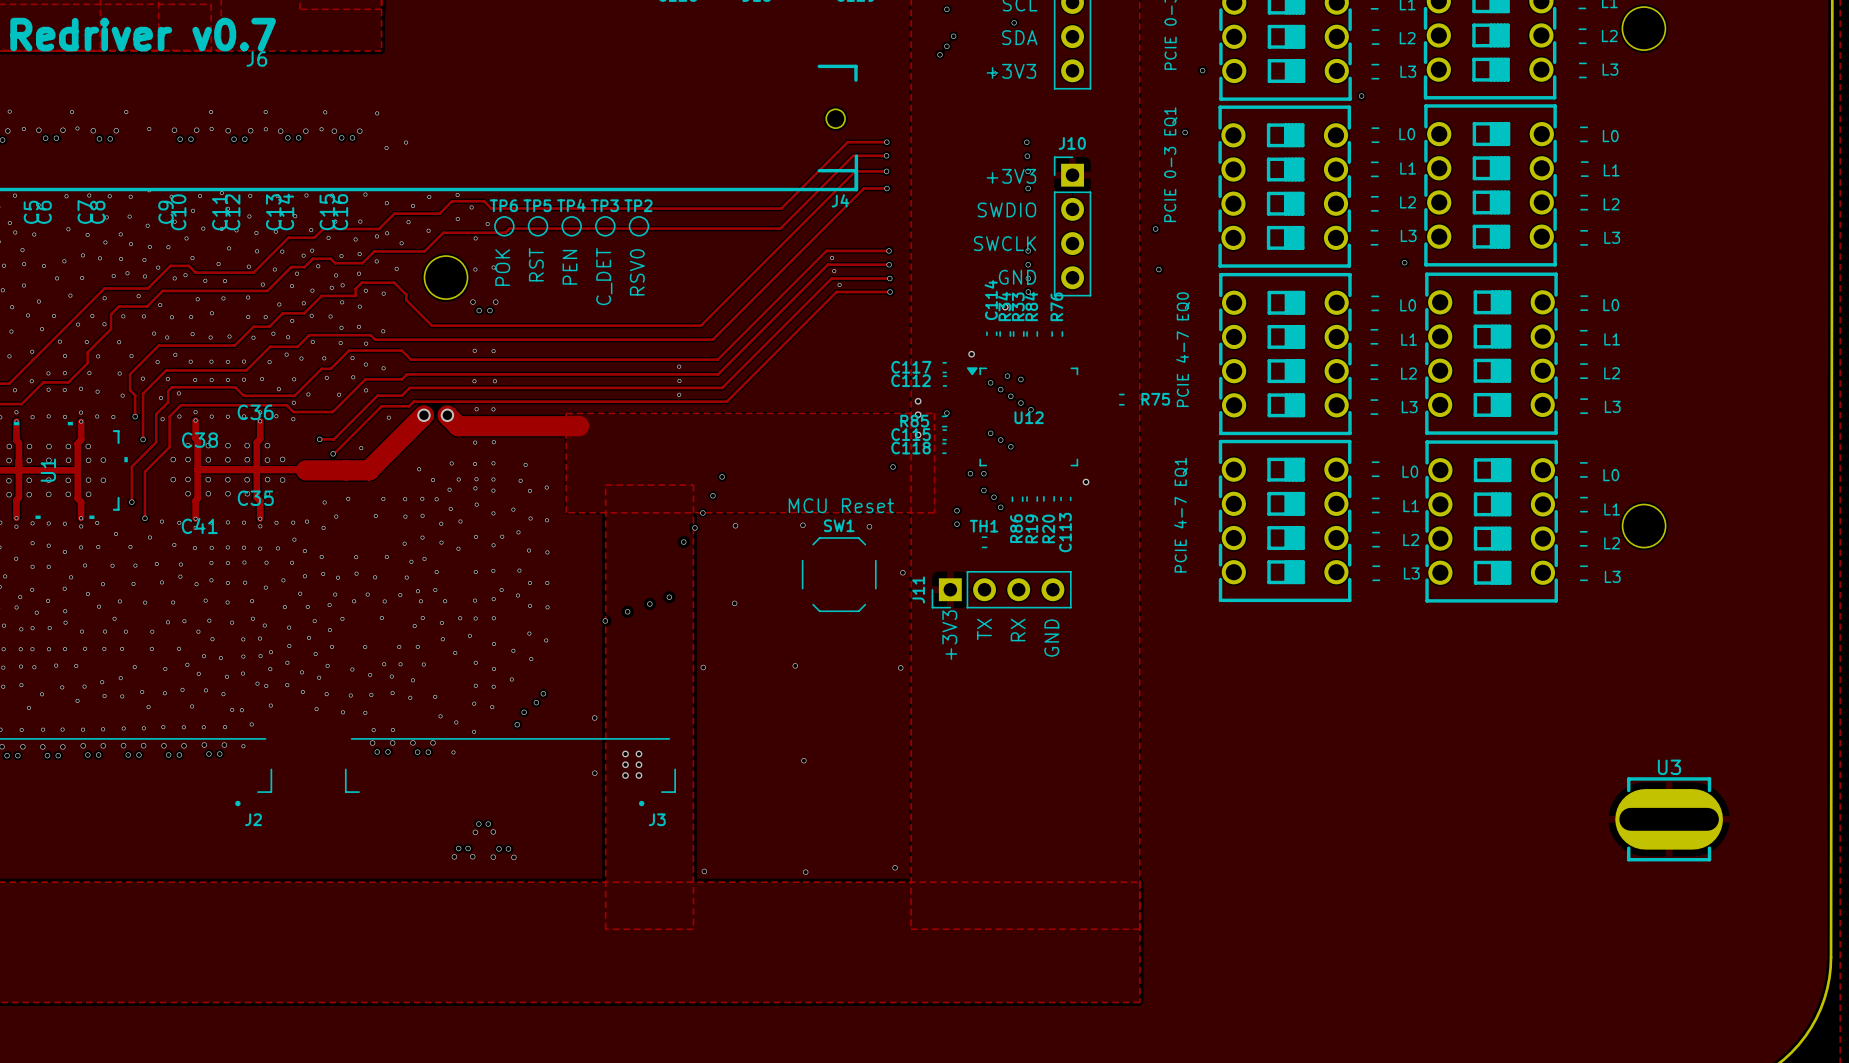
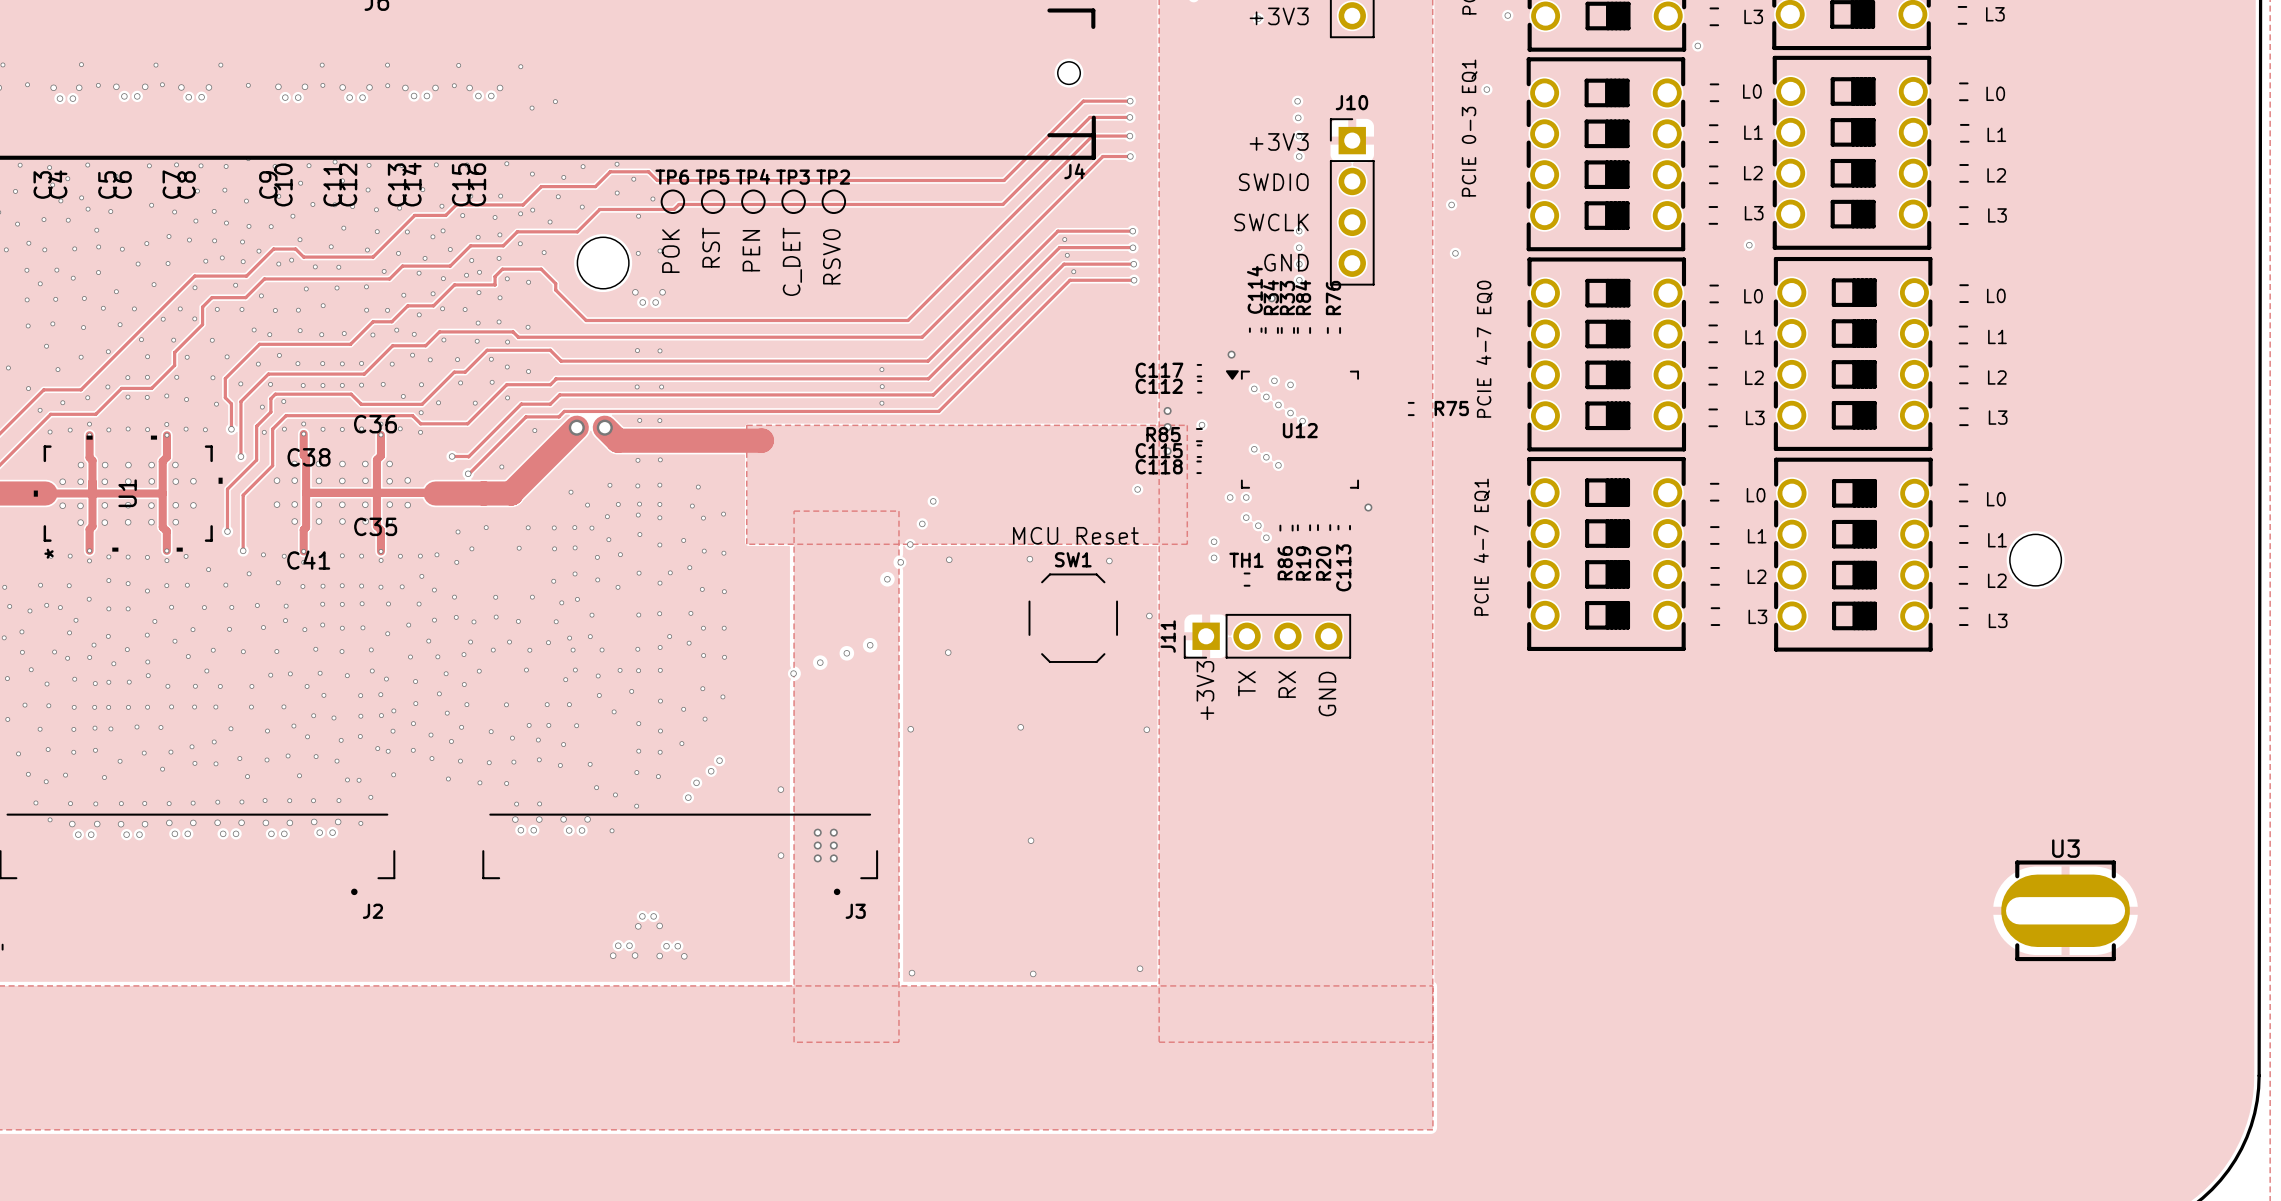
track: (335, 263) (330, 258) (312, 258) (304, 267) (291, 267) -> (470, 245) (450, 266) (402, 266)
track: (291, 267) (278, 280) -> none

